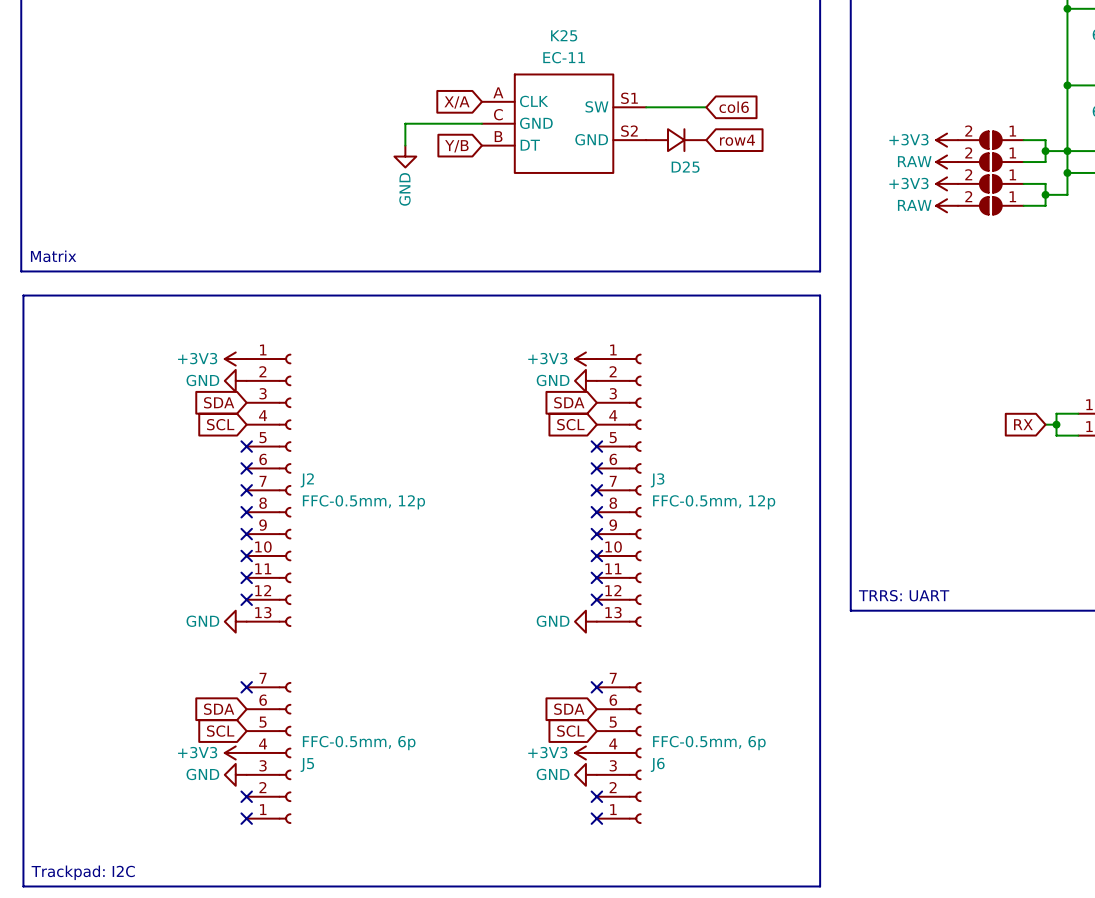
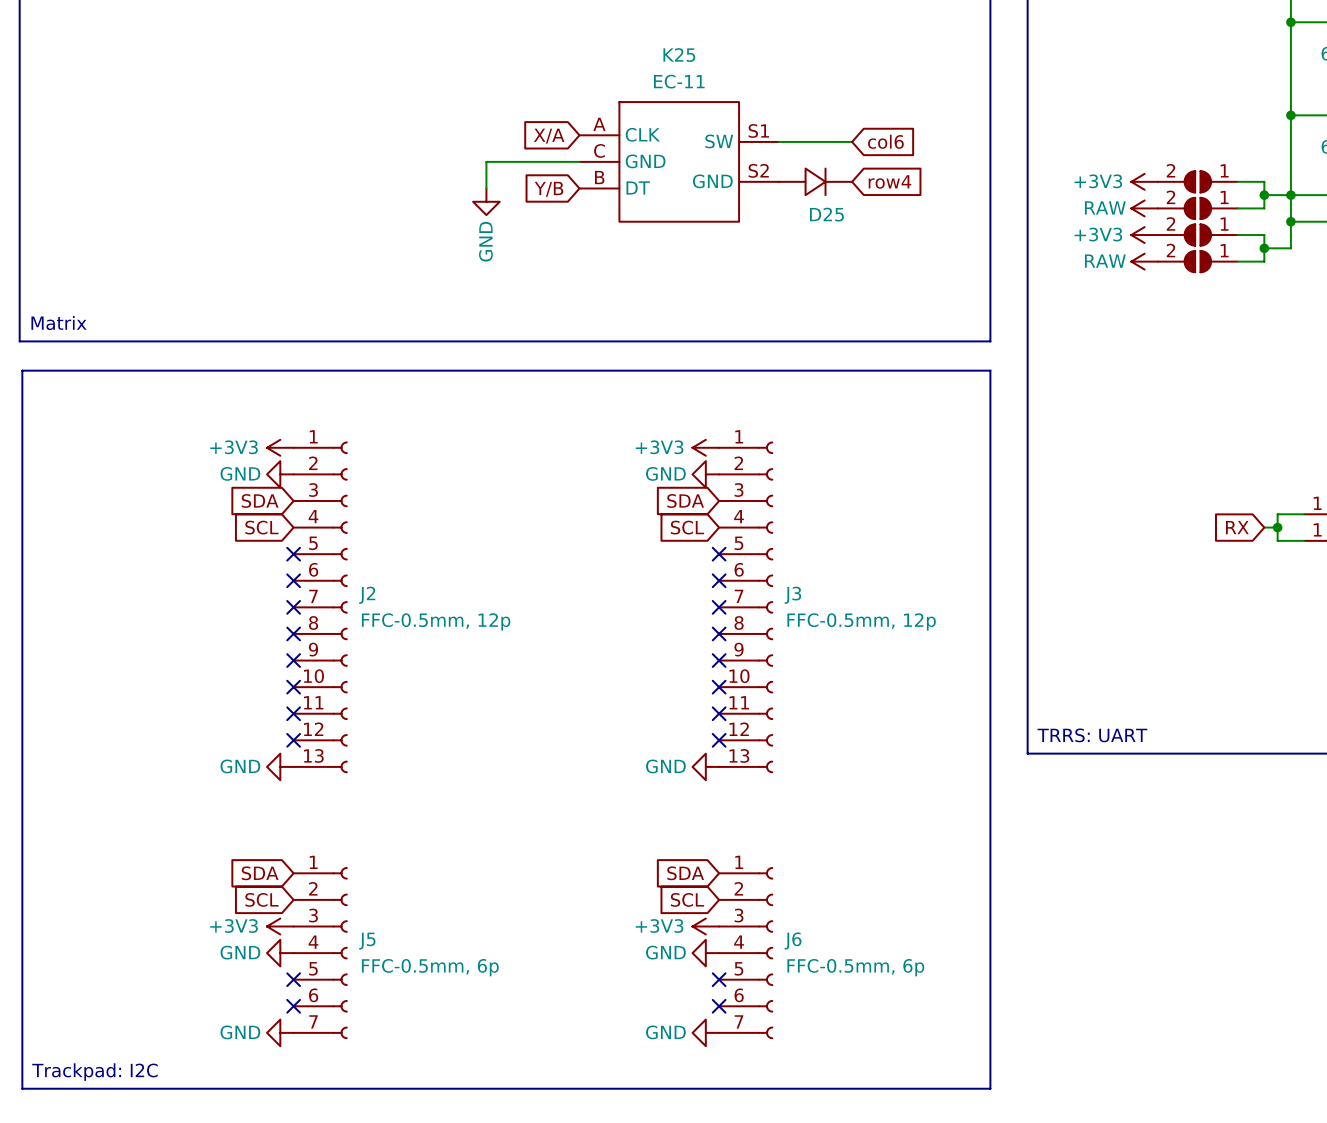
no-connect mark: (246, 687) -> none
no-connect mark: (596, 687) -> none
J5 flip: as is (284, 752) -> up-down (340, 953)
J6 flip: as is (635, 752) -> up-down (765, 953)
power symbol: none -> GND (280, 1032)
power symbol: none -> GND (705, 1032)

